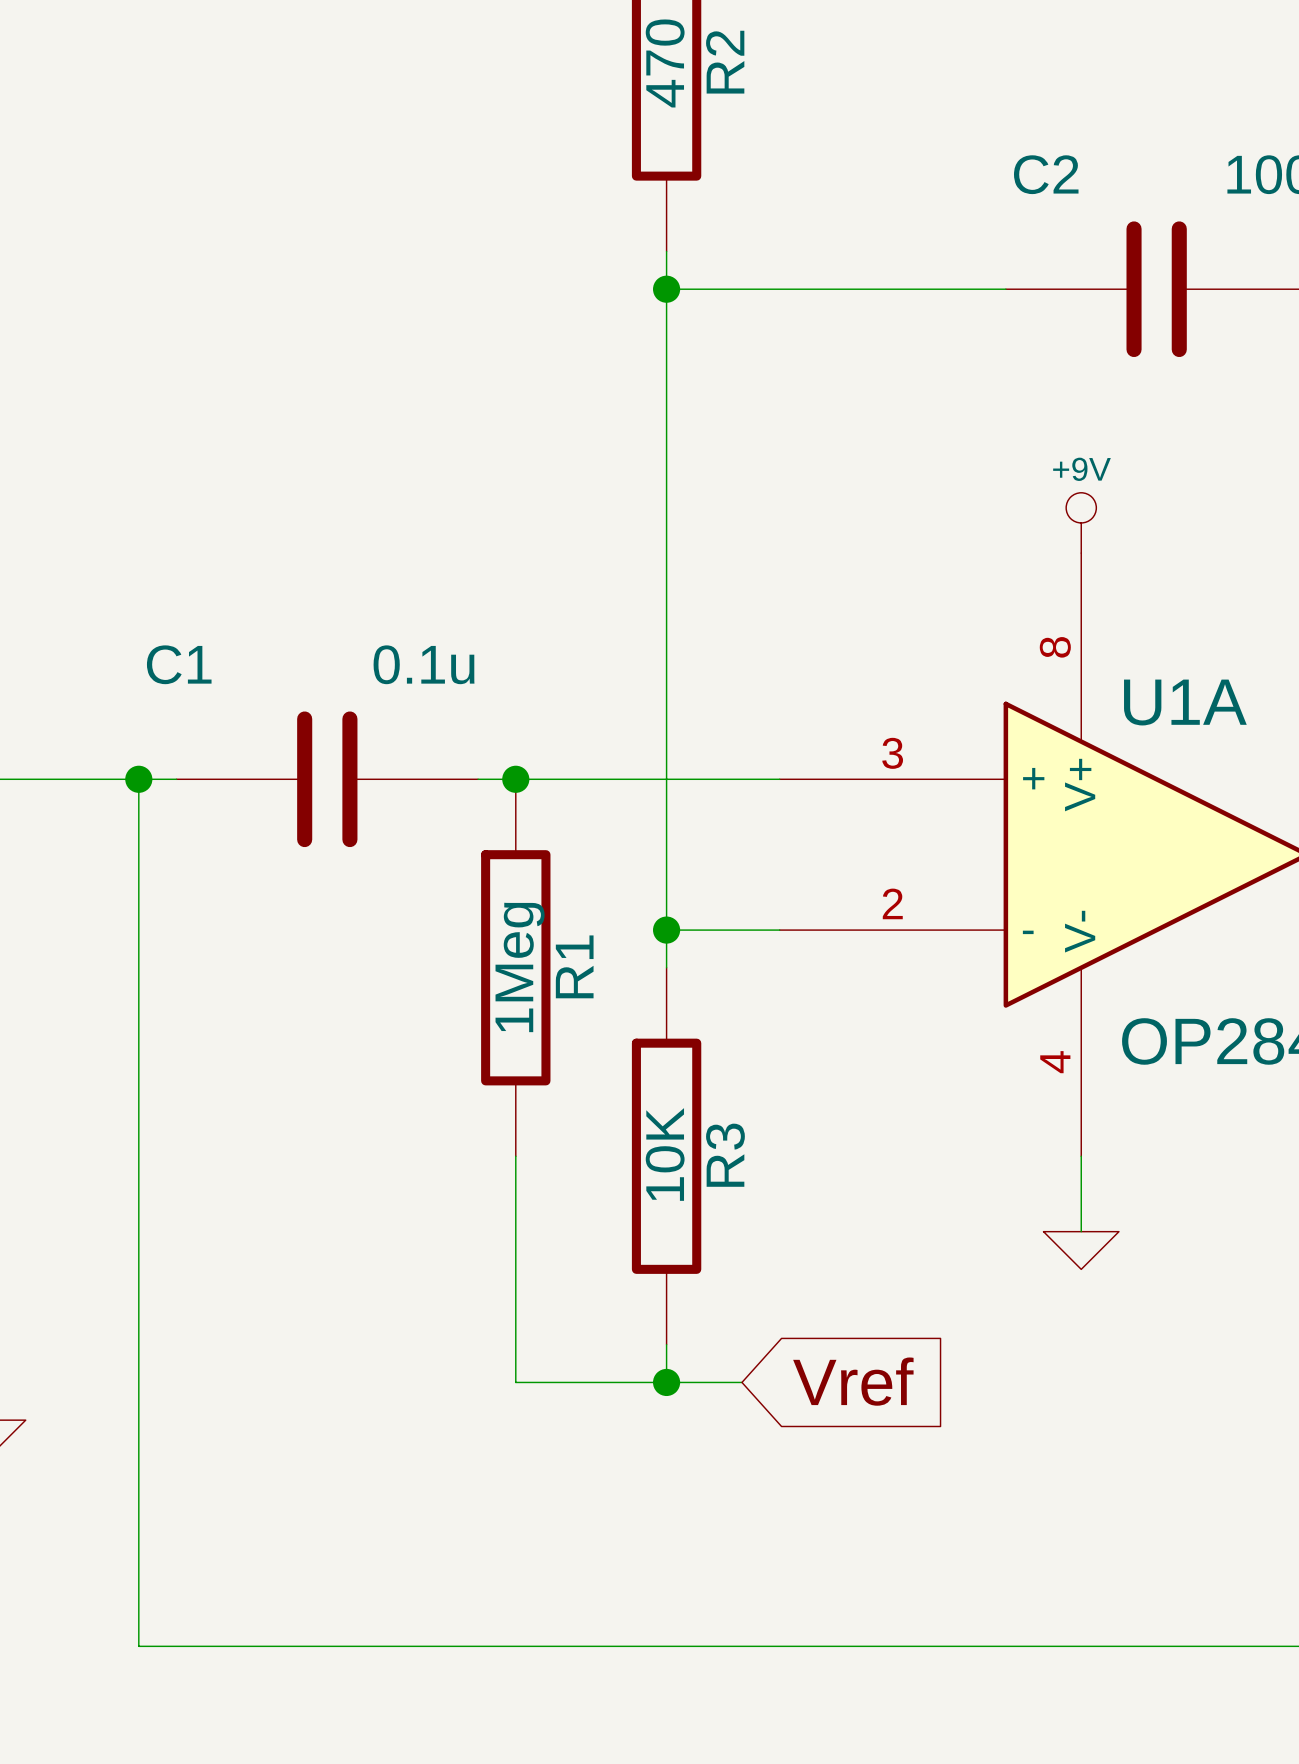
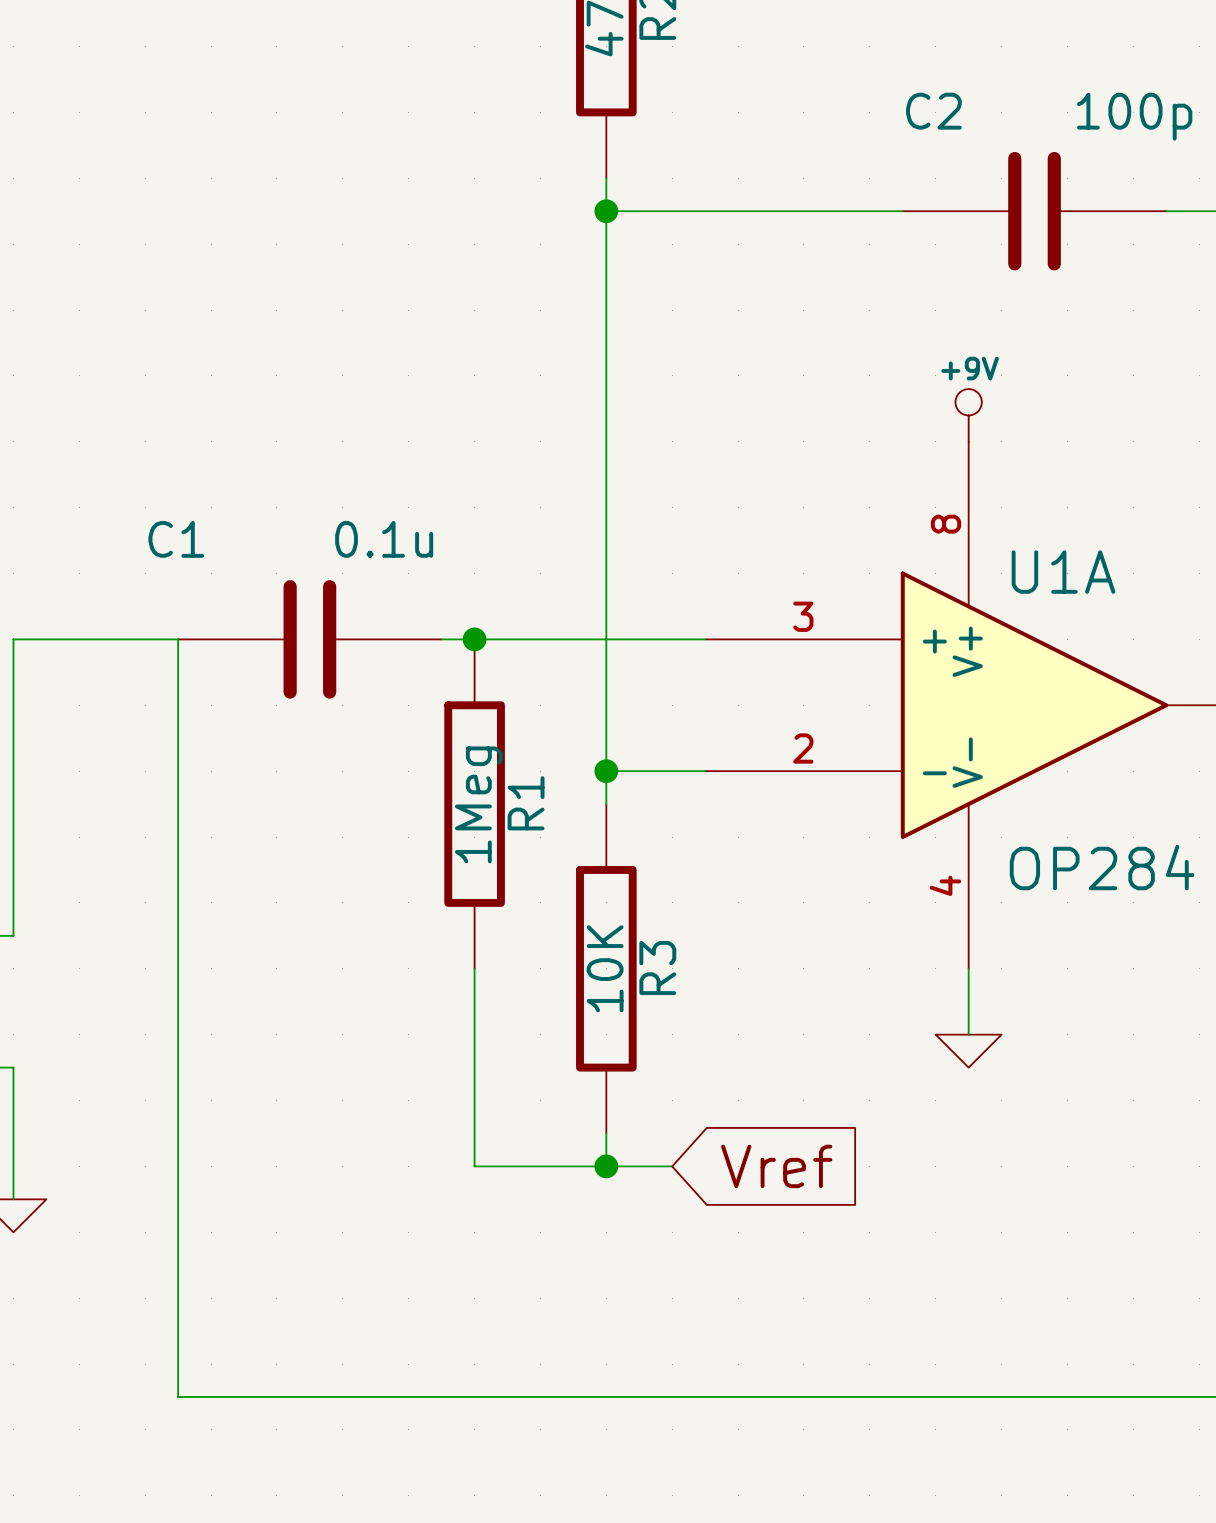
wire: (138, 779) (138, 1646) (176, 1646) -> (178, 639) (178, 1396)
junction: (138, 779) -> none

